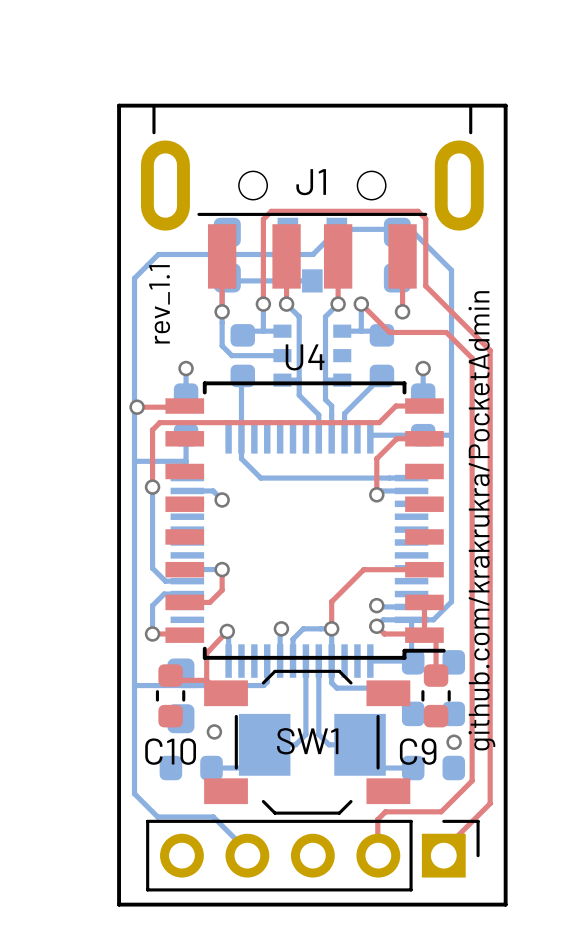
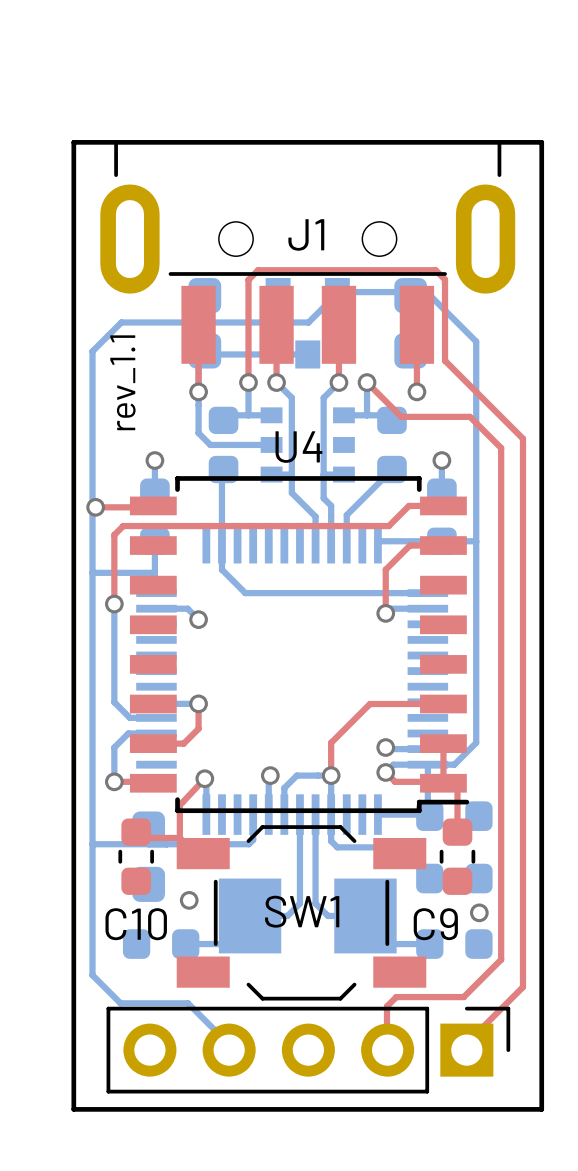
text: github.com/krakrukra/PocketAdmin (481, 520) -> none

